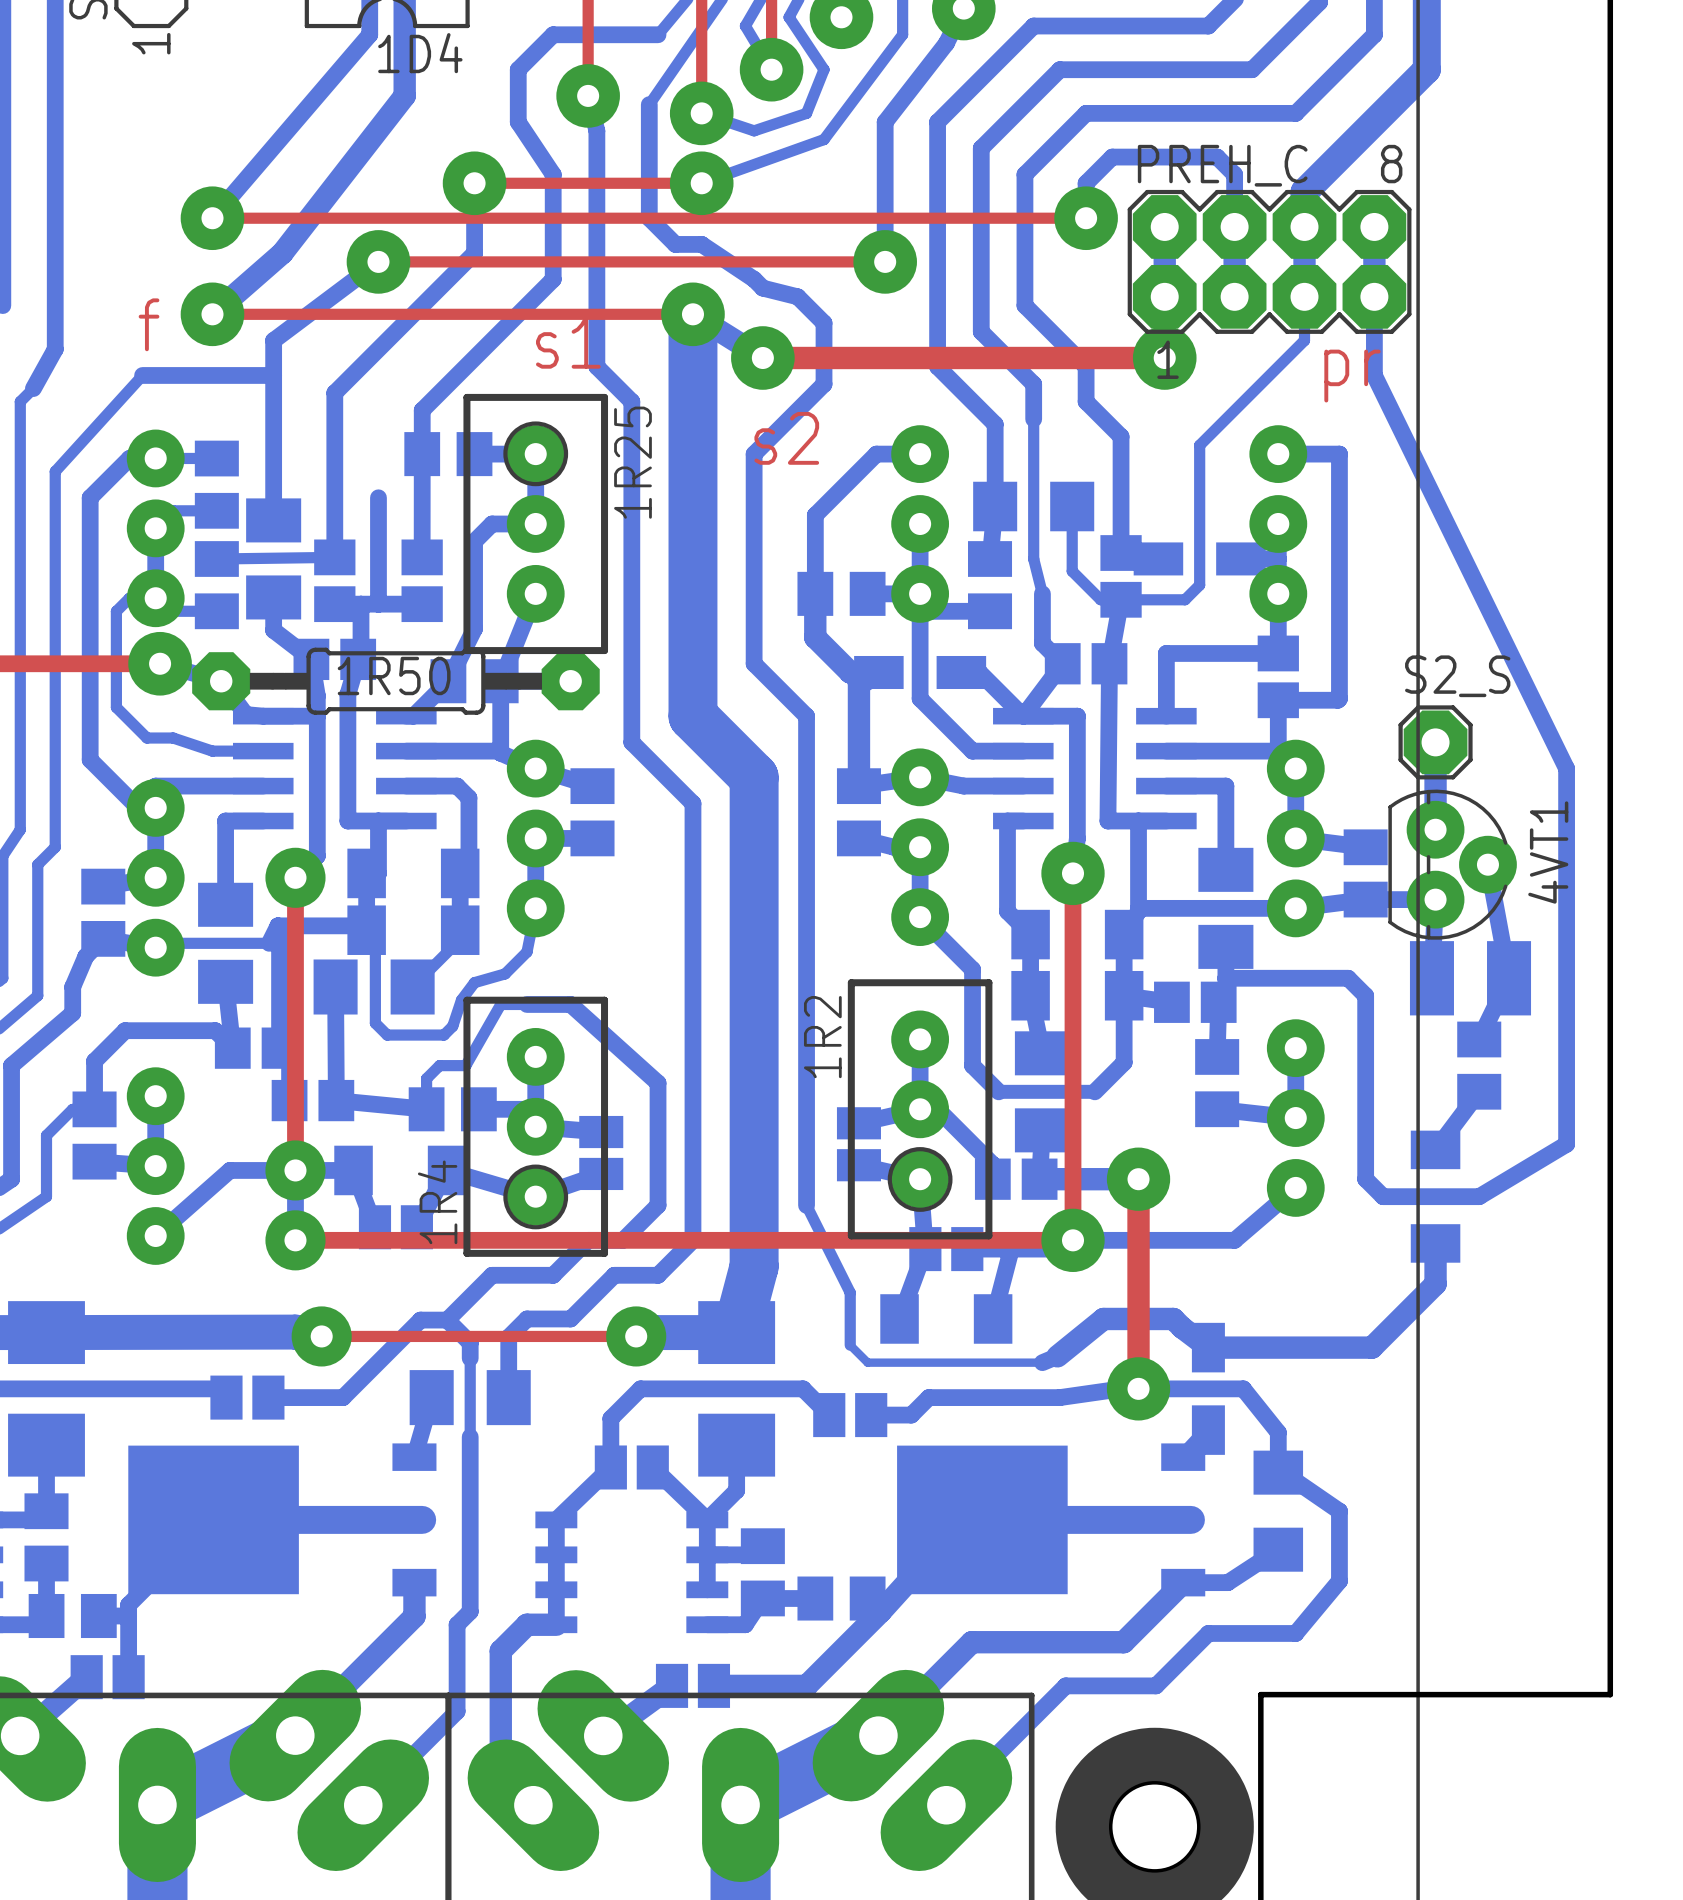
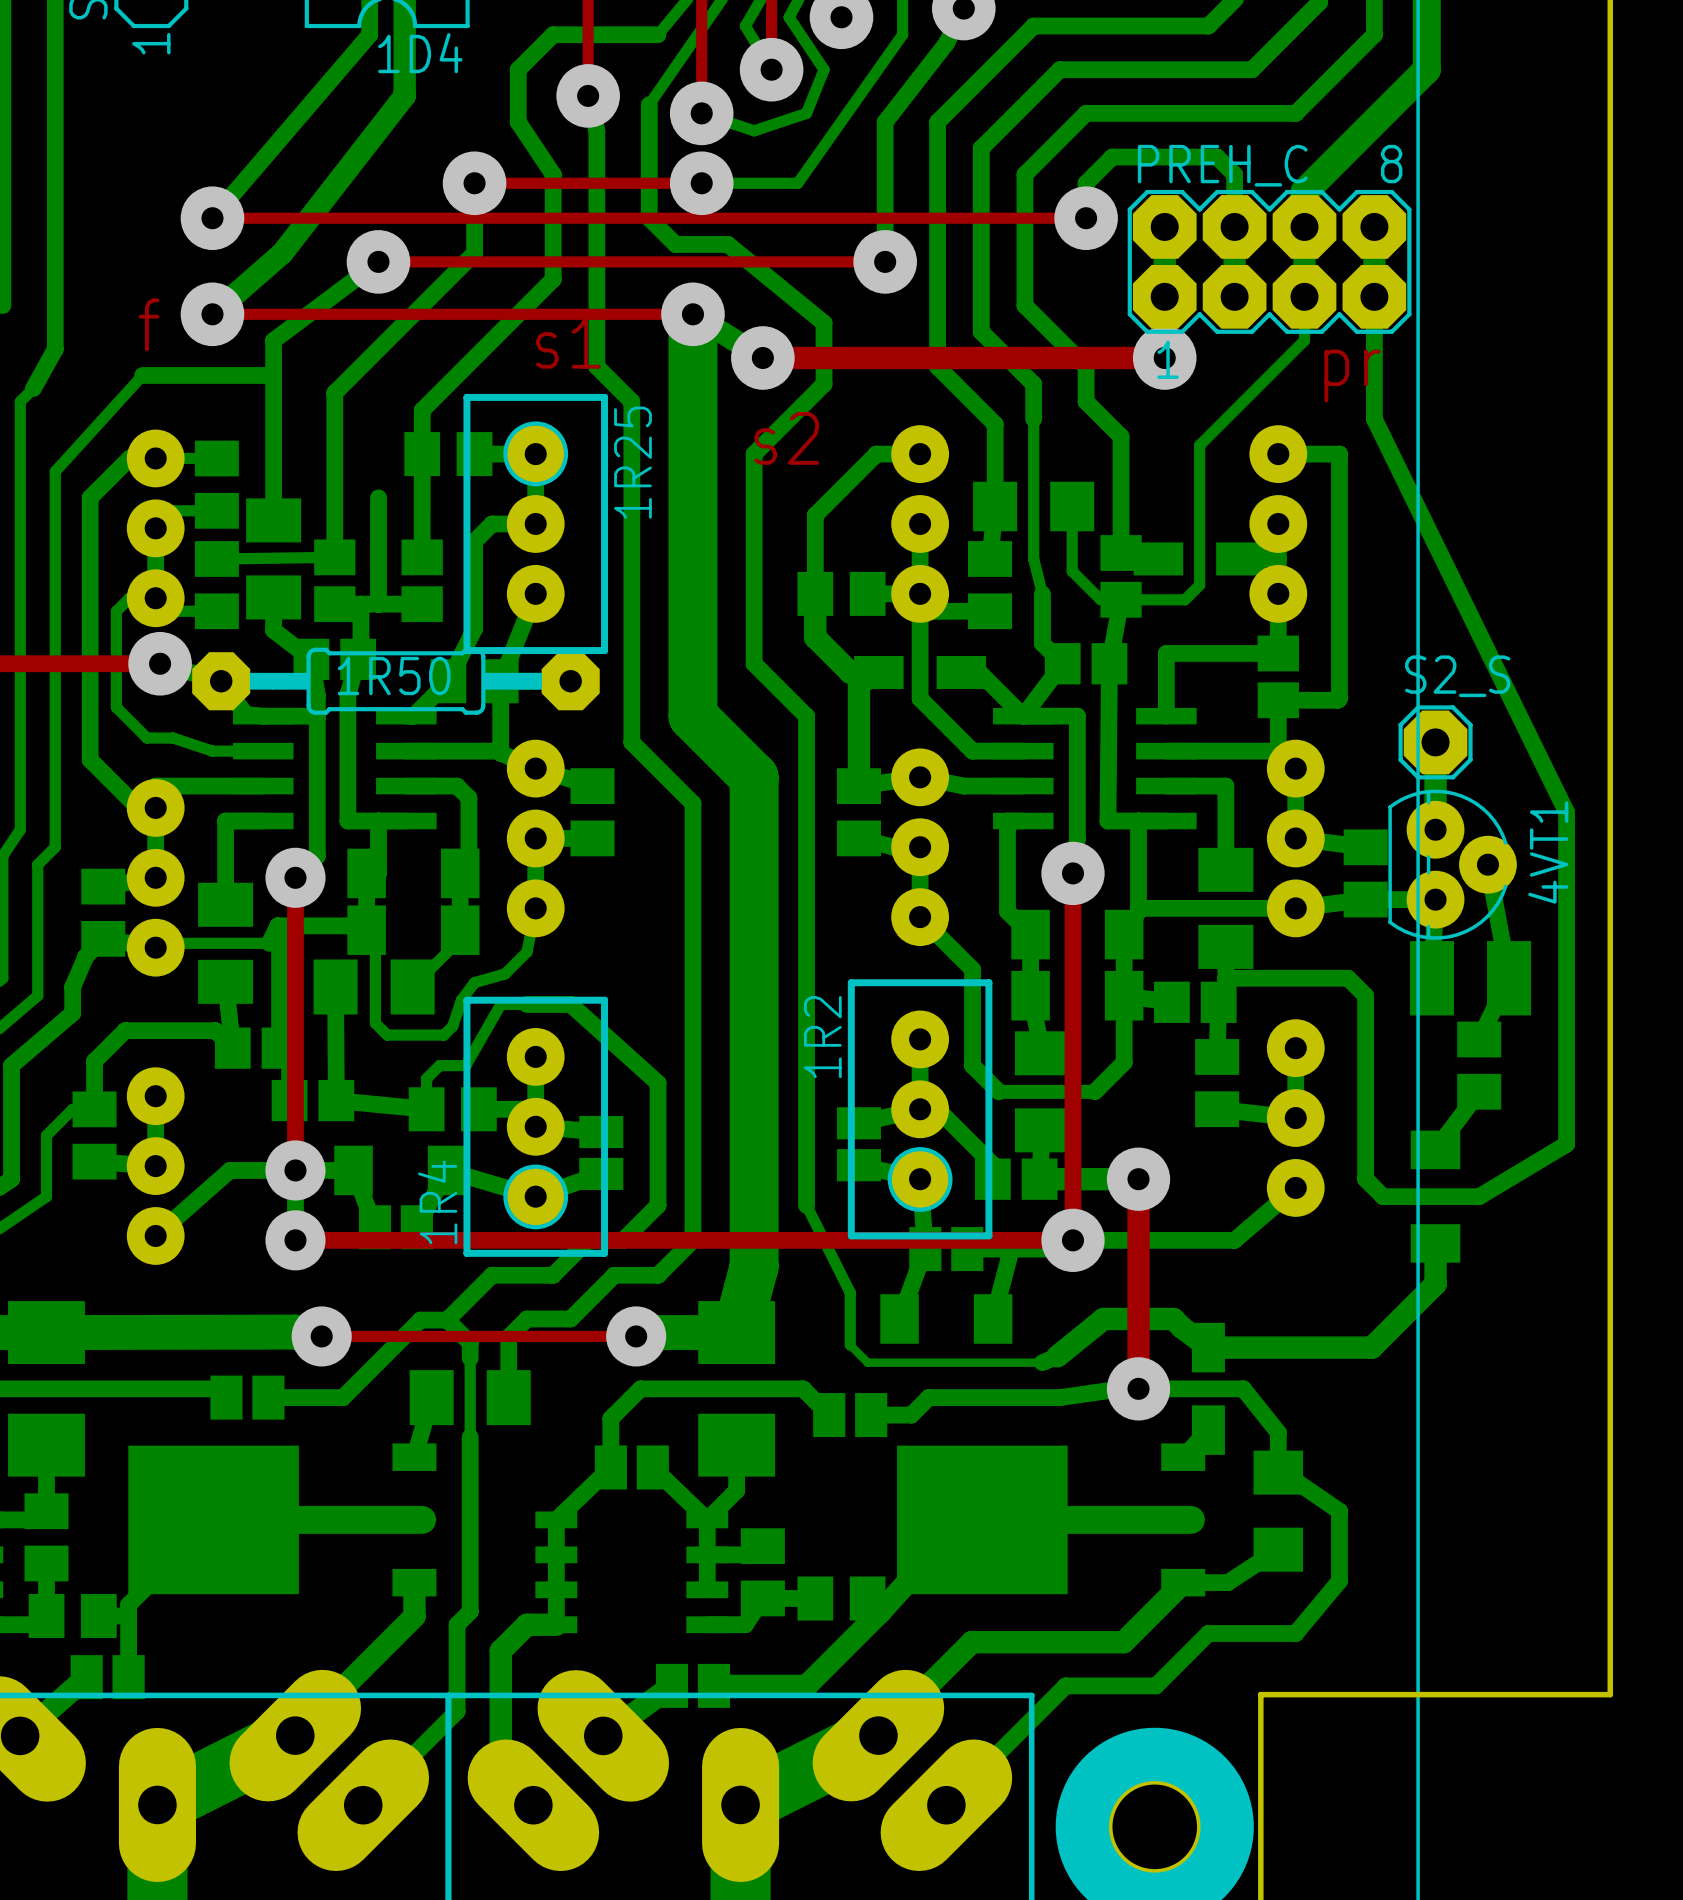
bottom track: (902, 34) (824, 139) (701, 183) -> (902, 34) (797, 183) (701, 183)
bottom track: (701, 244) (754, 279) (762, 288) (797, 296) (824, 323) -> (701, 244) (727, 244) (824, 323)
bottom track: (1374, 375) (1566, 768) (1566, 812) -> (1374, 375) (1374, 419) (1566, 812)

